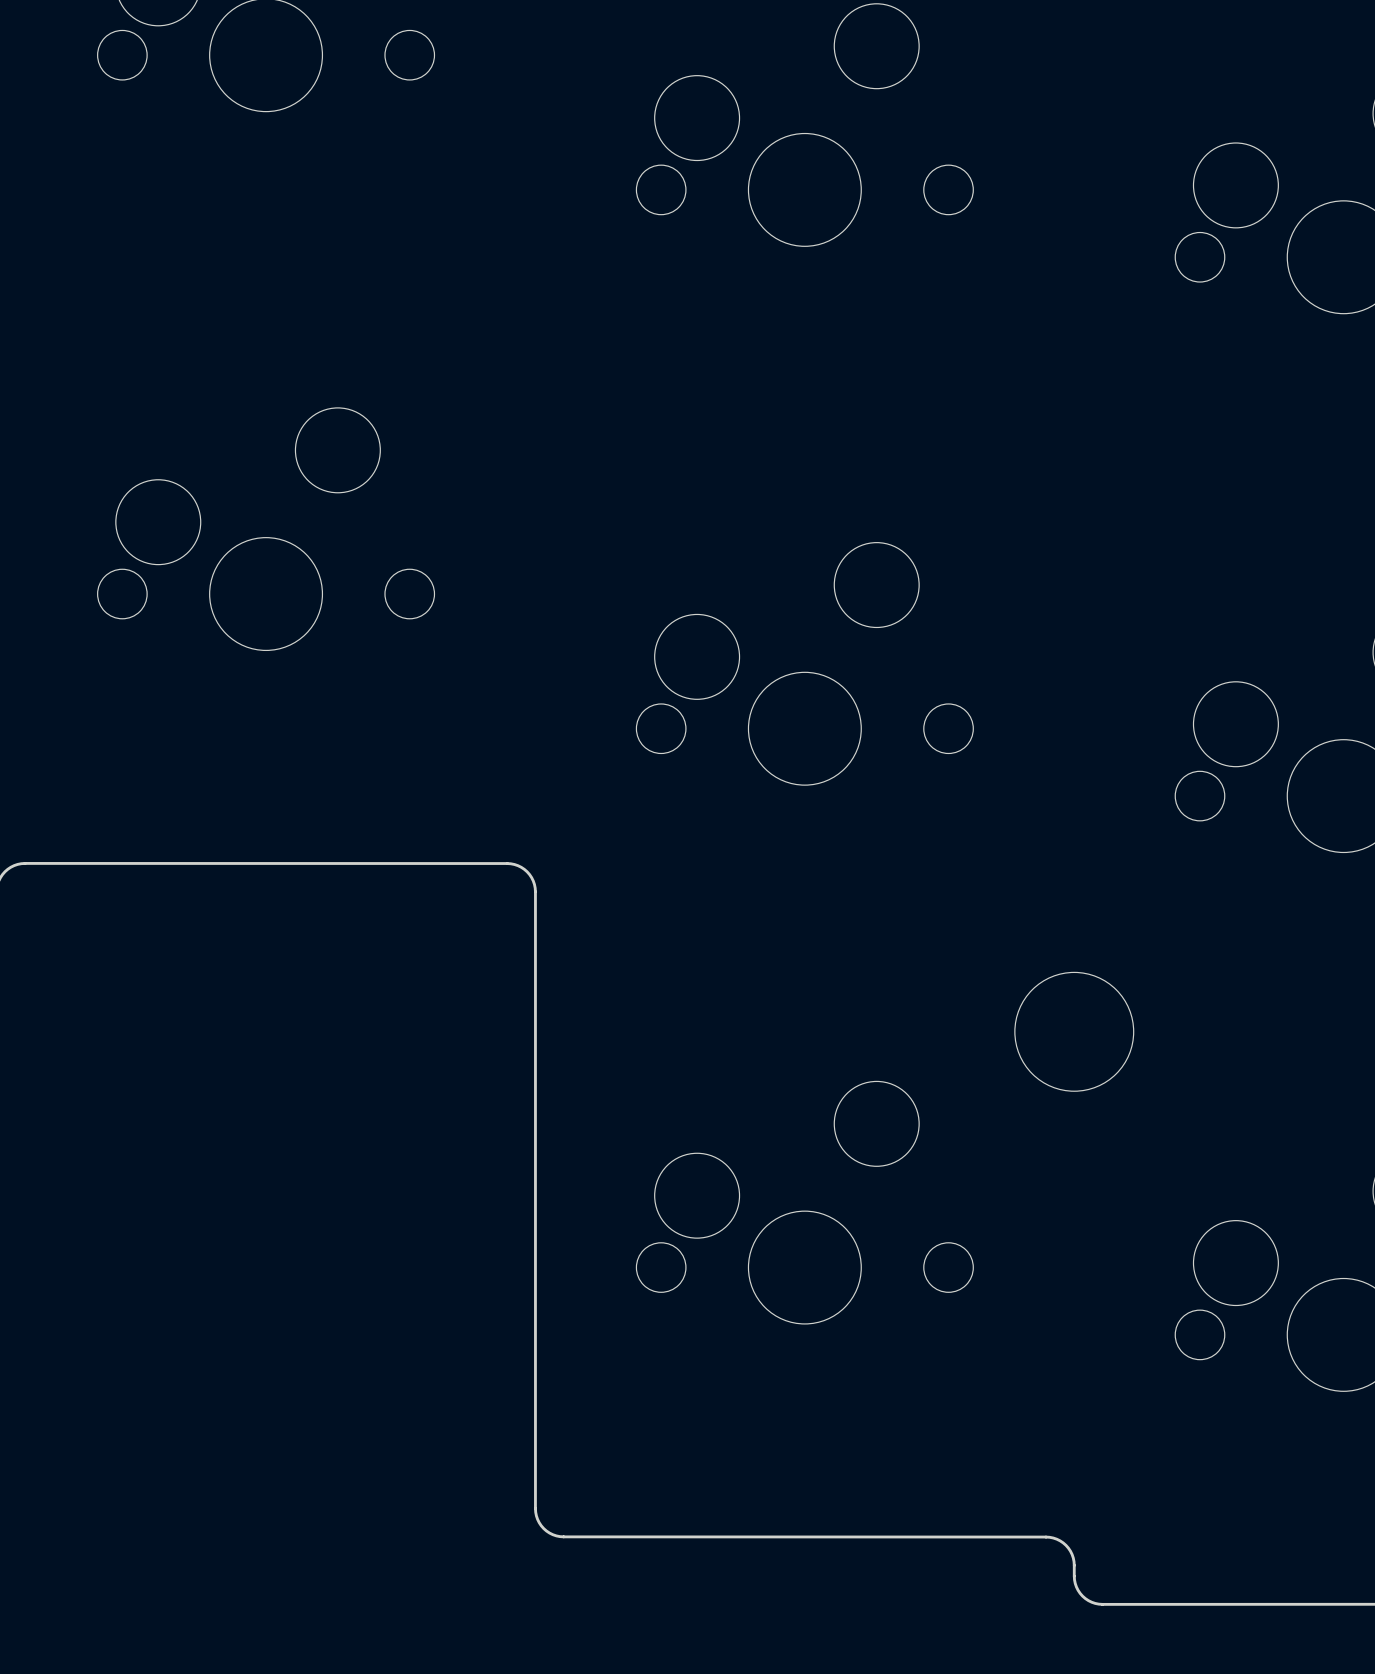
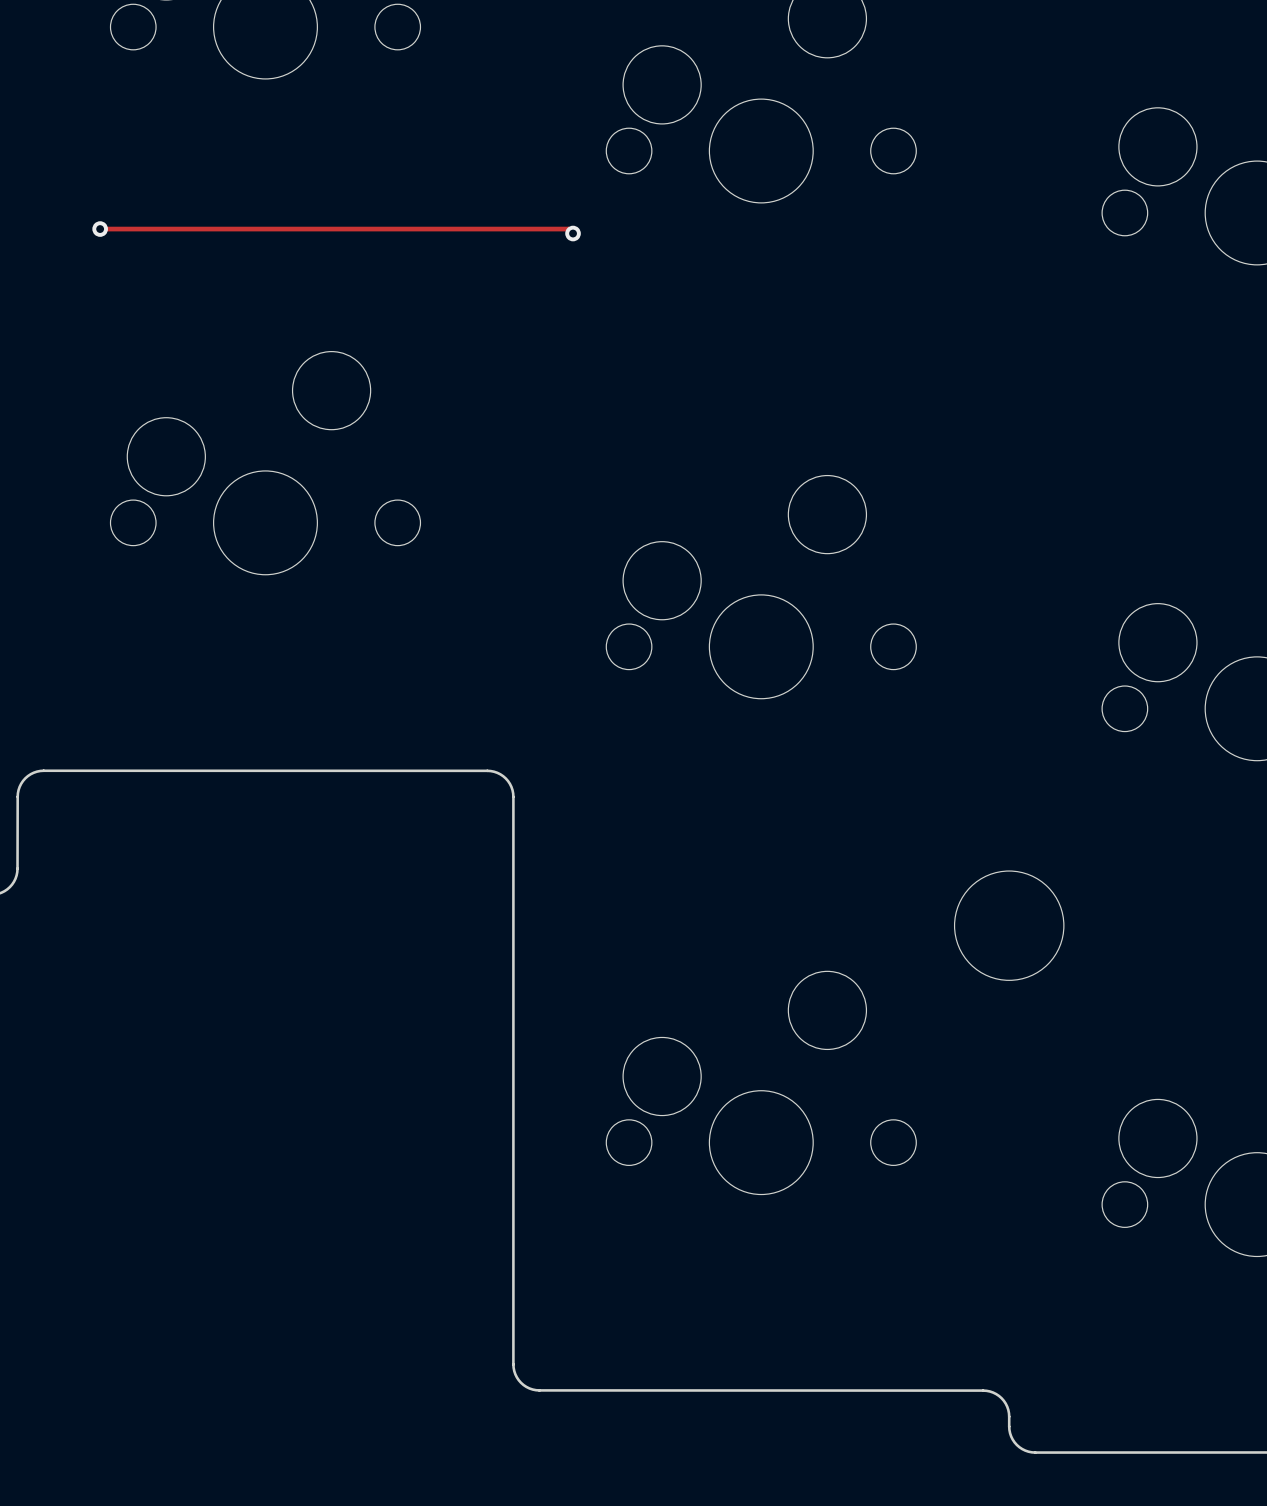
track: none -> (100, 229) (568, 229) (573, 233)
via: none -> (100, 229)
via: none -> (573, 233)

